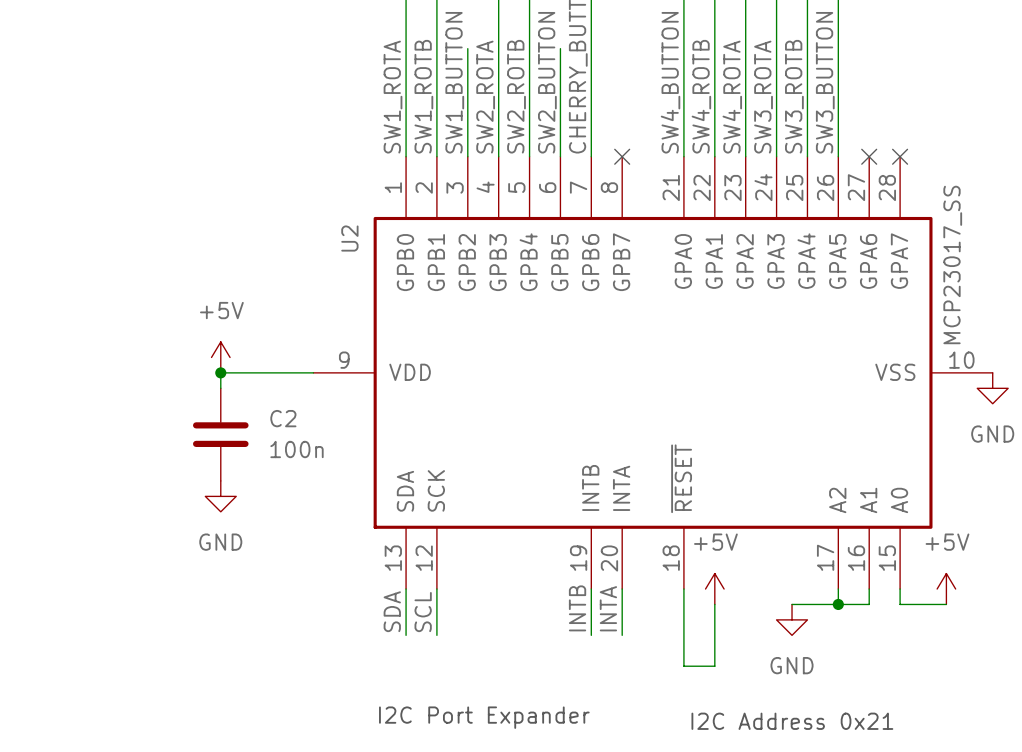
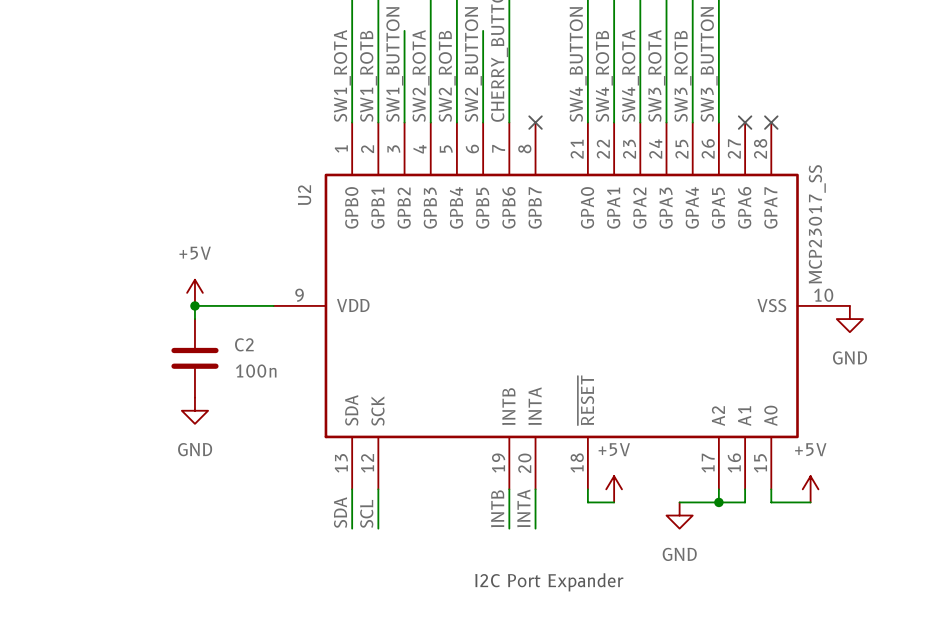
wire: (683, 604) (683, 666) (714, 666) (714, 604) -> (587, 502) (614, 502)
text position: I2C Port Expander (484, 717) -> I2C Port Expander (549, 582)
text: I2C Address 0x21 (792, 721) -> none

